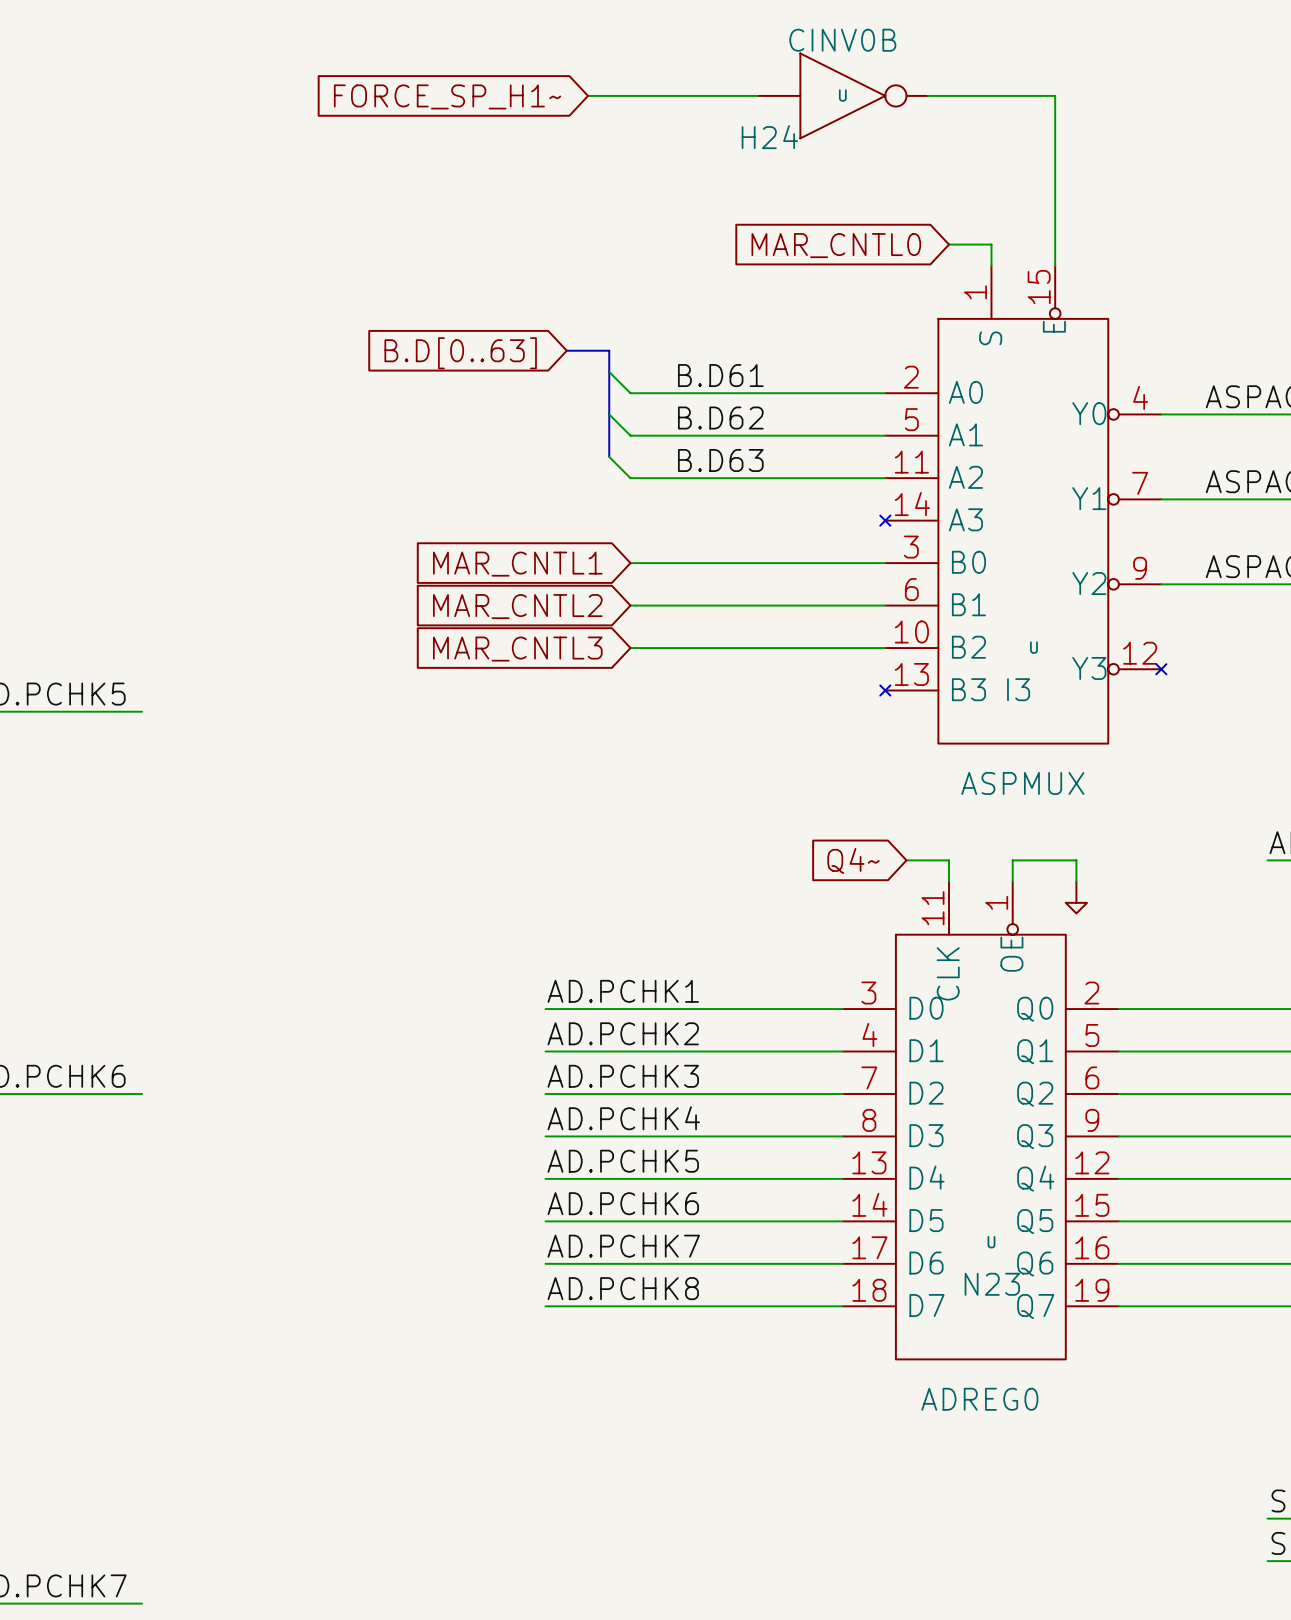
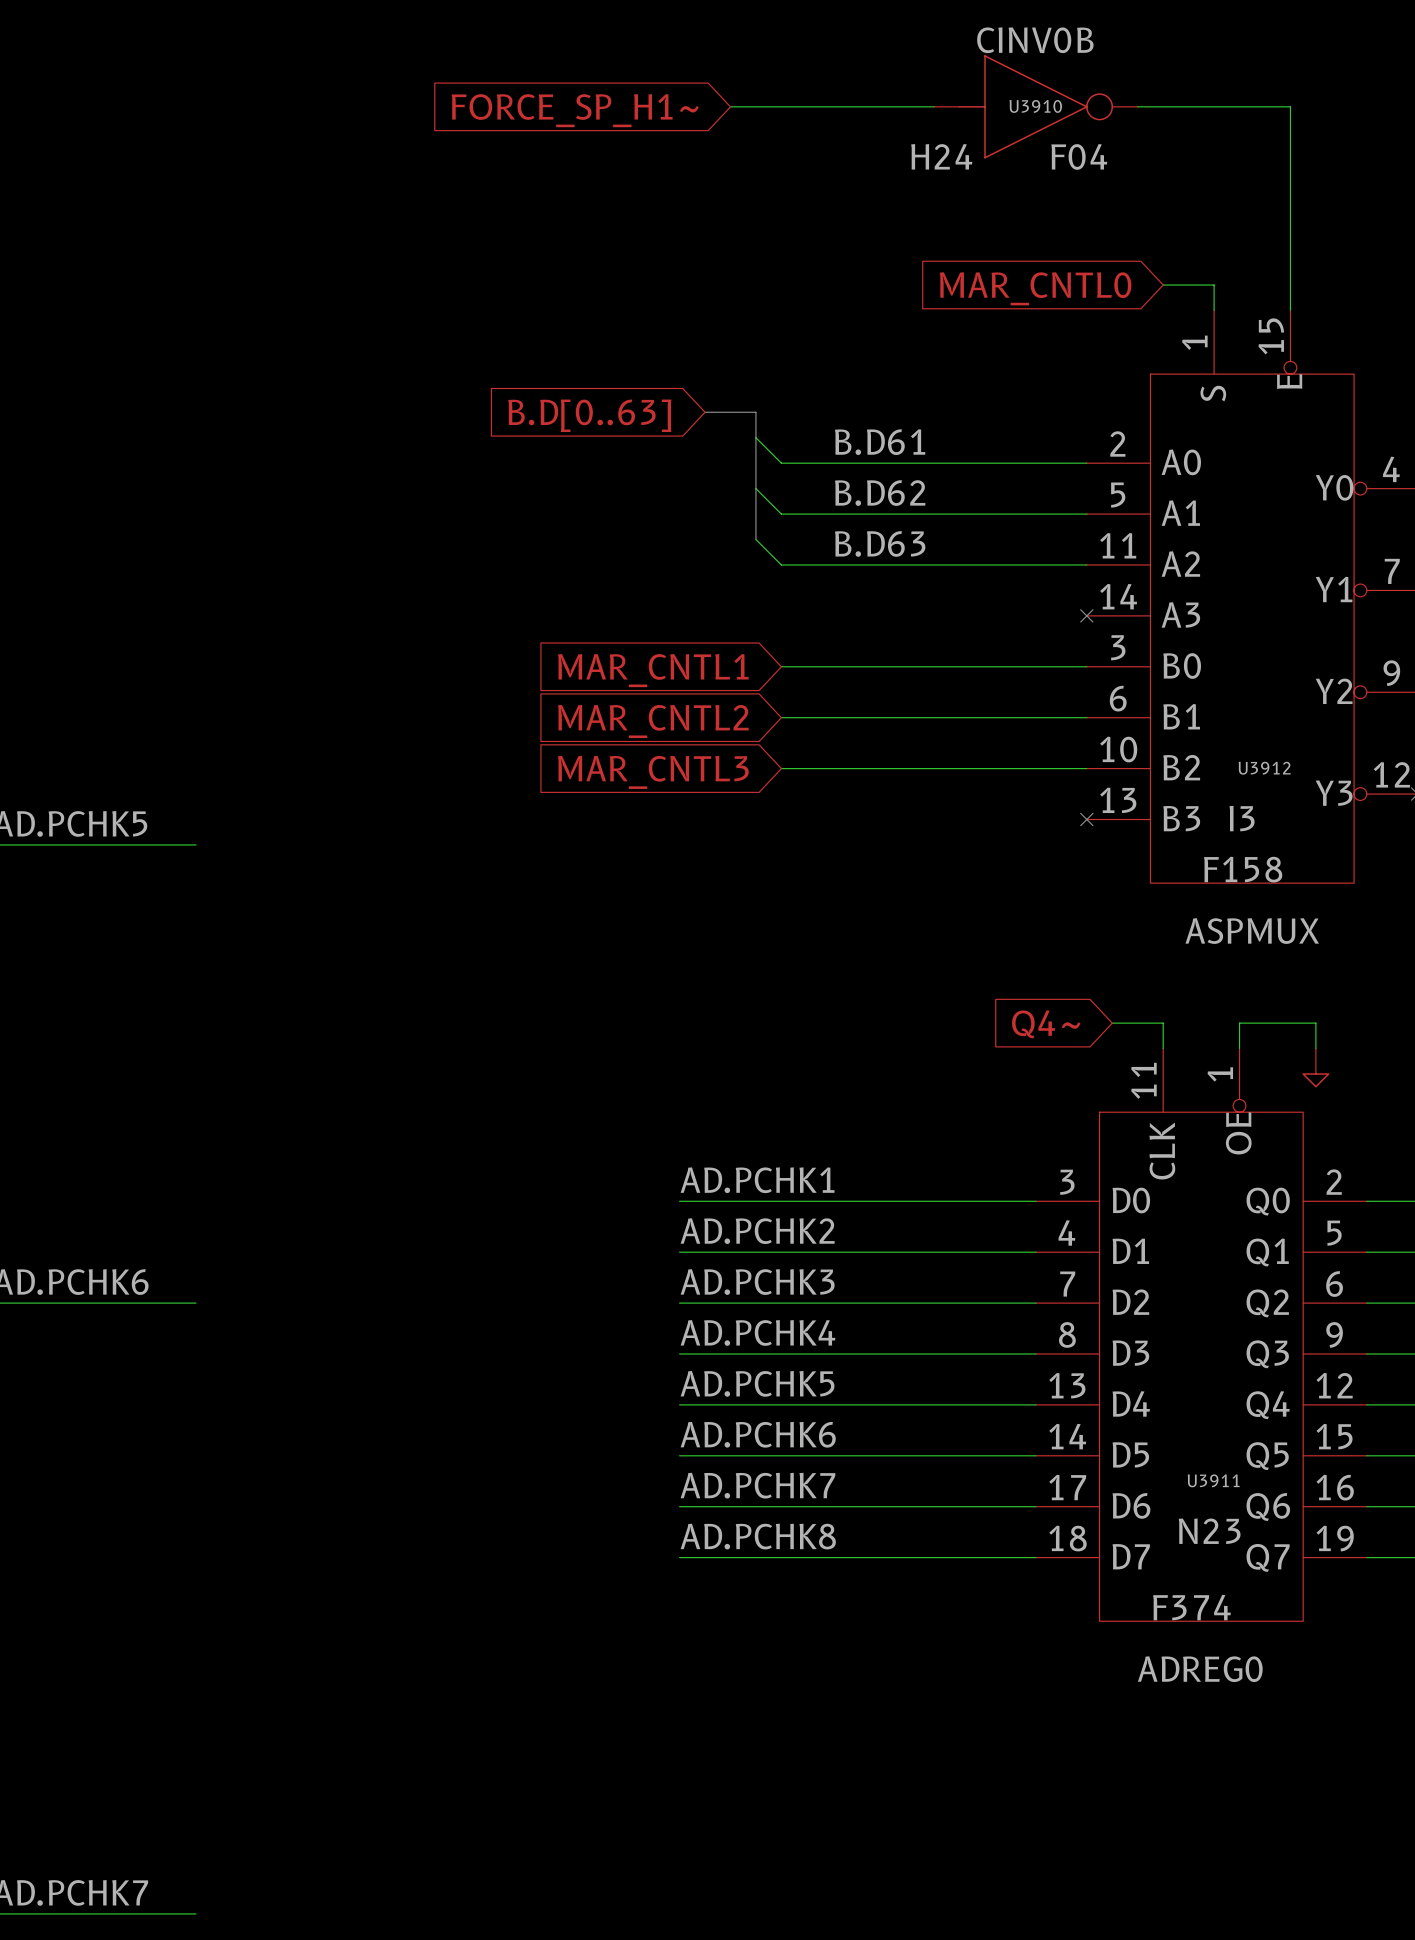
U name: U (842, 95) -> U3910 (1035, 106)
U value: none -> F04 (1079, 156)
U name: U (1033, 647) -> U3912 (1264, 768)
U value: none -> F158 (1243, 869)
U name: U (991, 1242) -> U3911 (1213, 1480)
U value: none -> F374 (1191, 1607)

